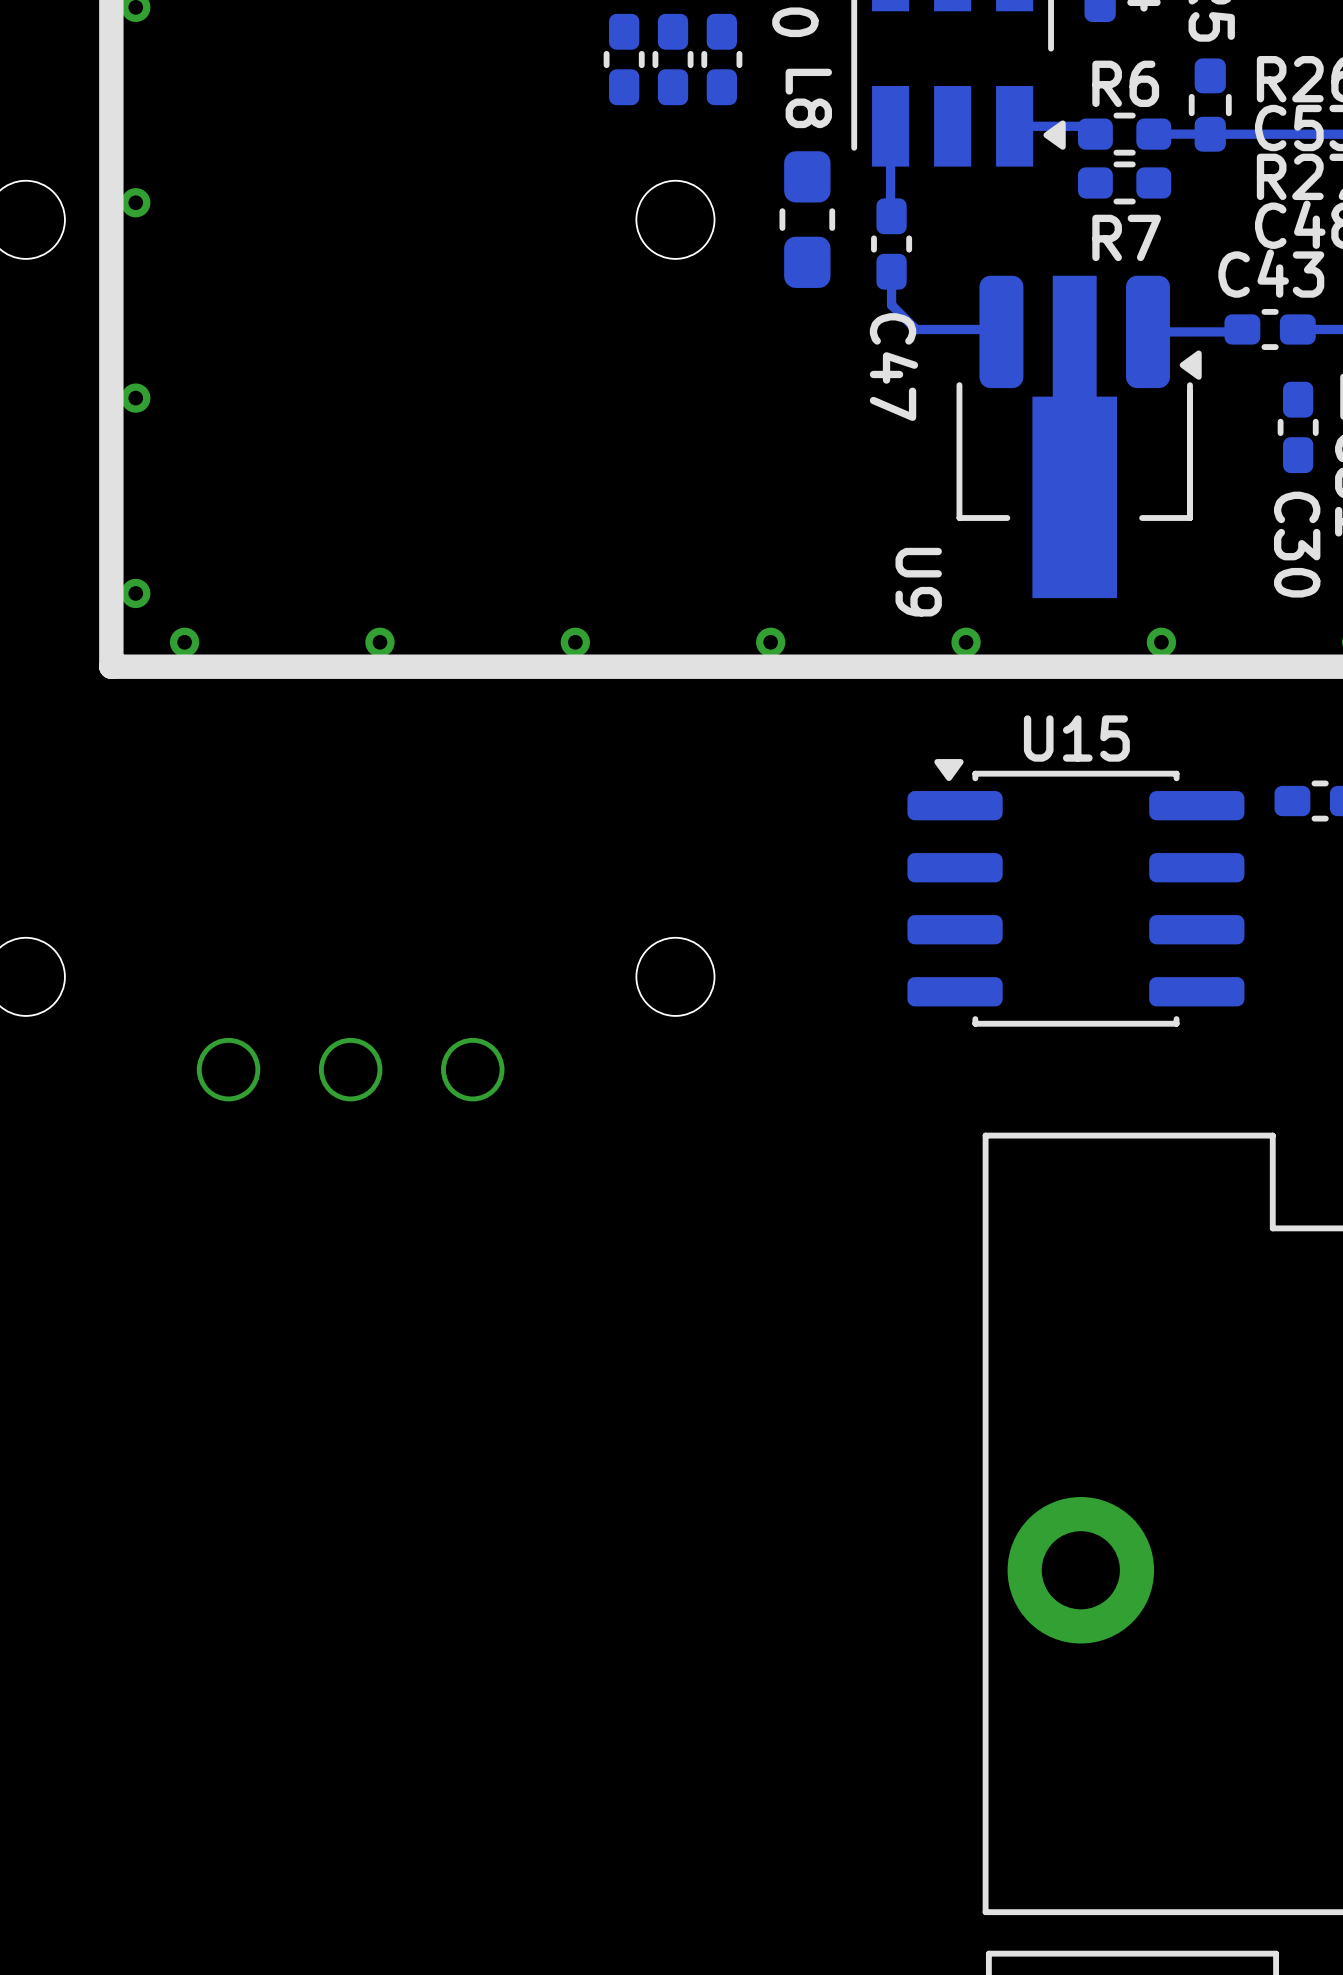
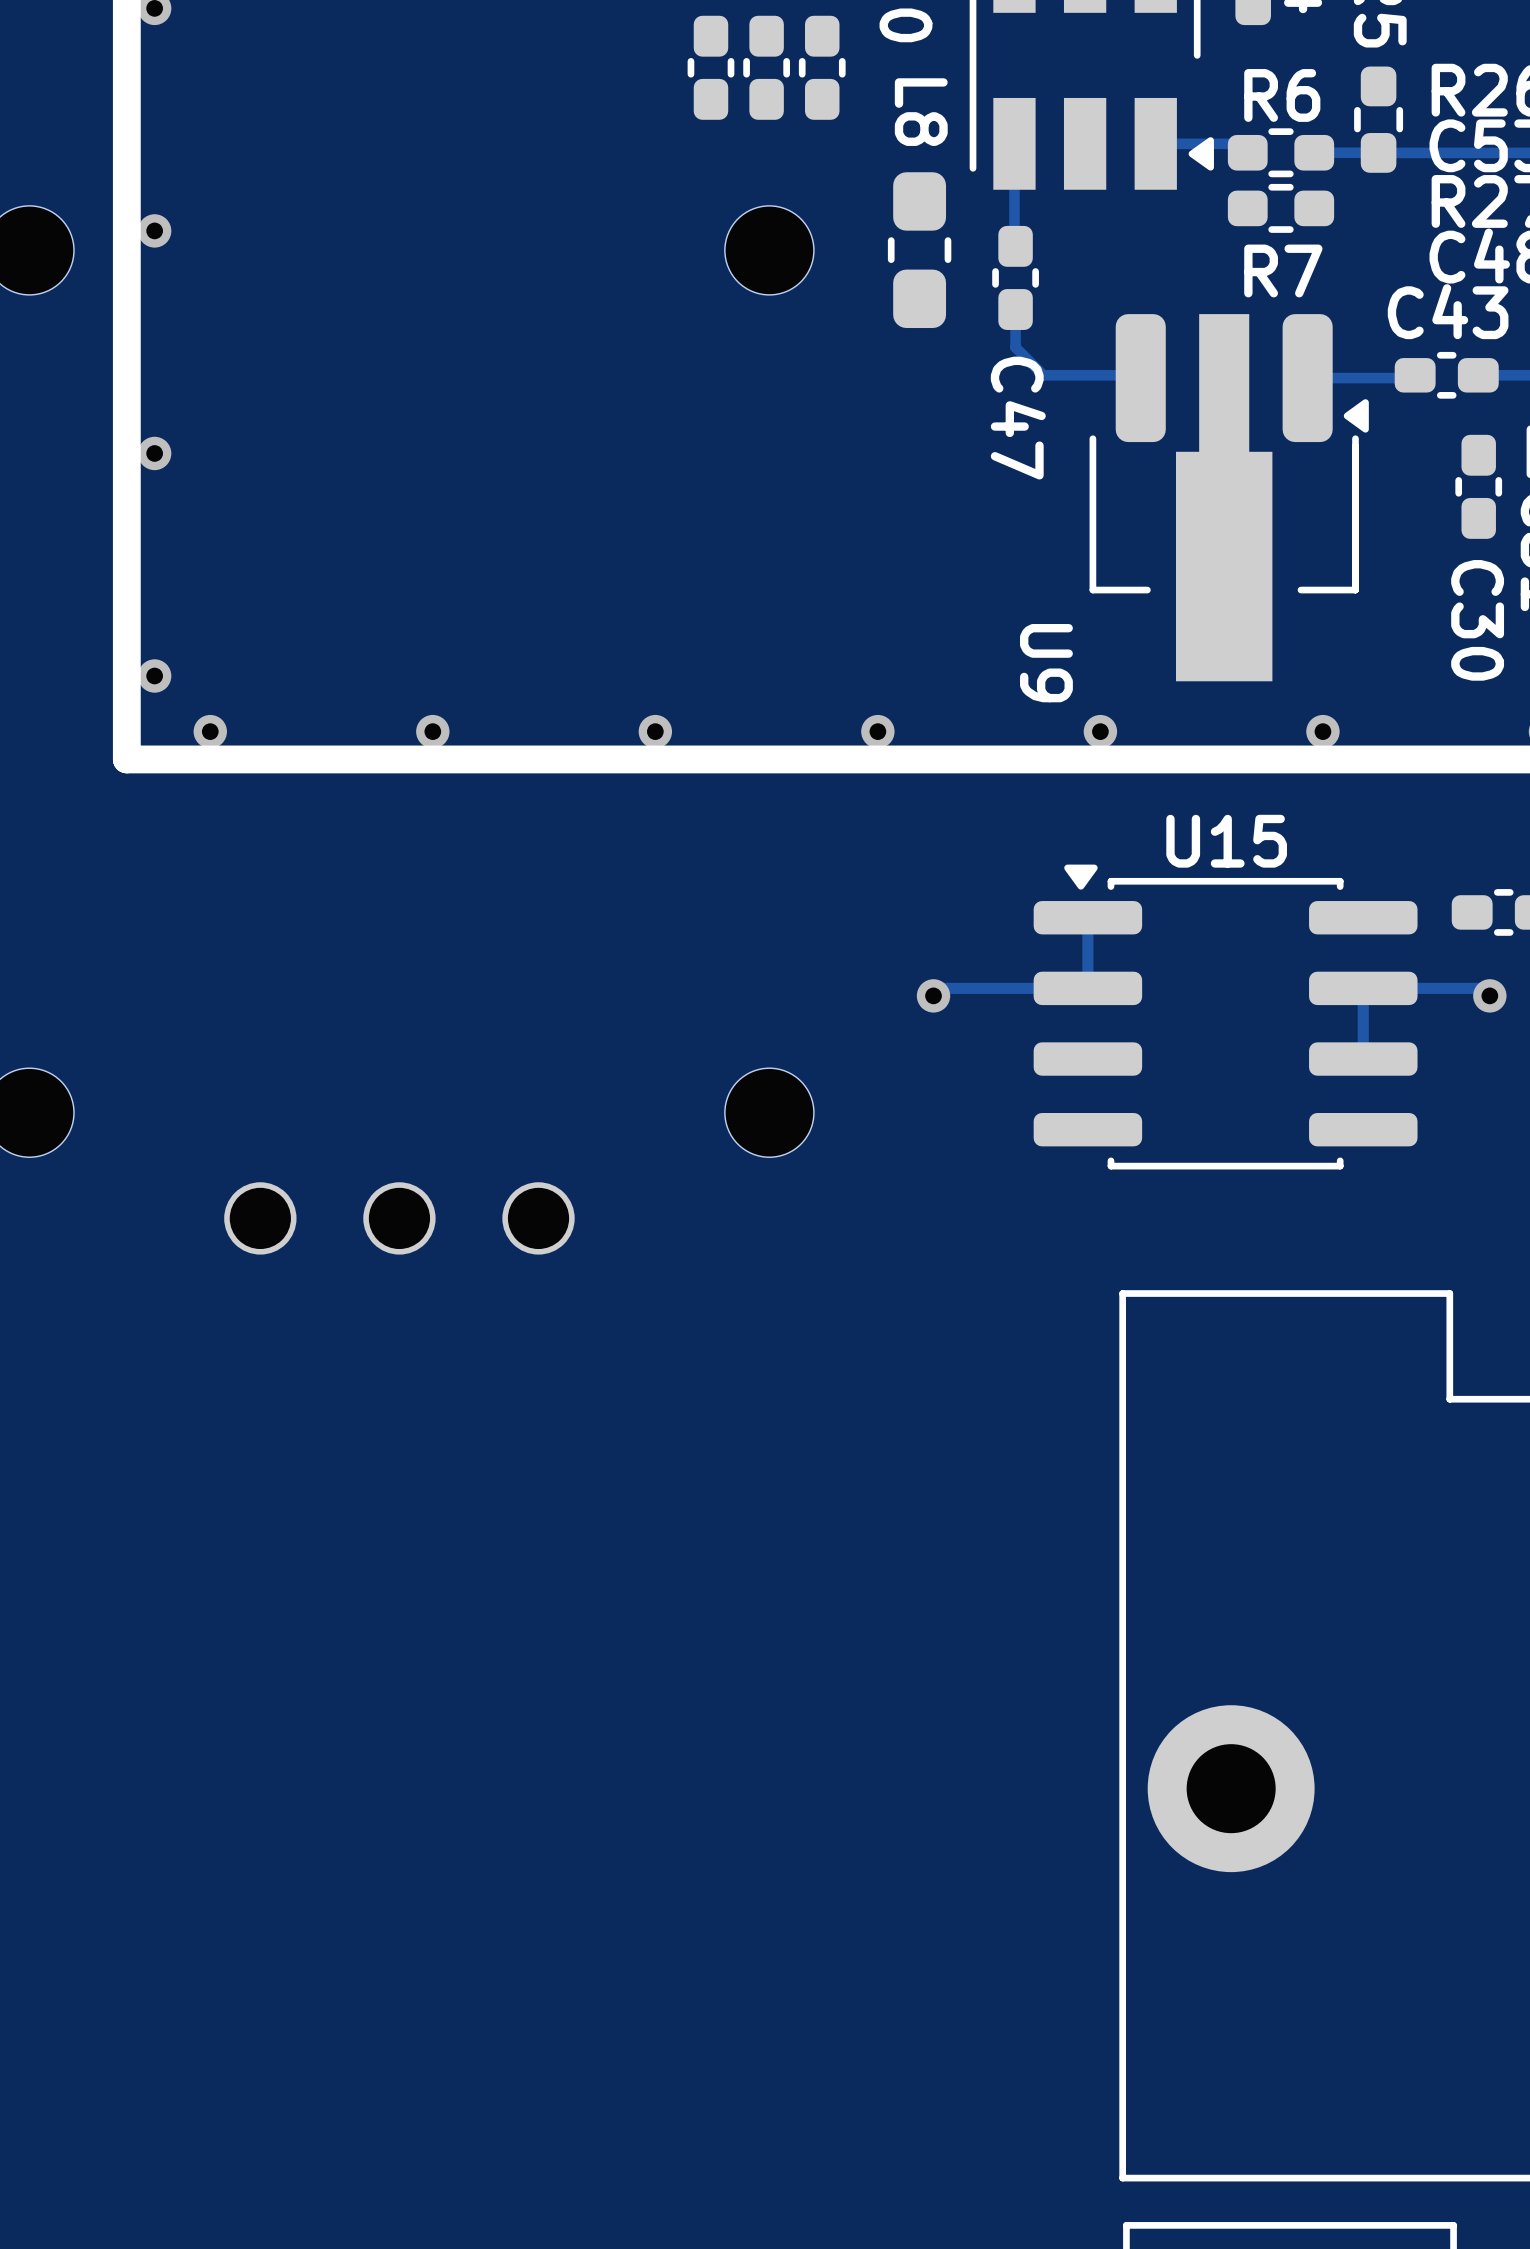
track: none -> (1087, 917) (1087, 988) (941, 988) (933, 995)
via: none -> (933, 995)
track: none -> (1489, 995) (1482, 988) (1363, 988) (1363, 1059)
via: none -> (1489, 995)

